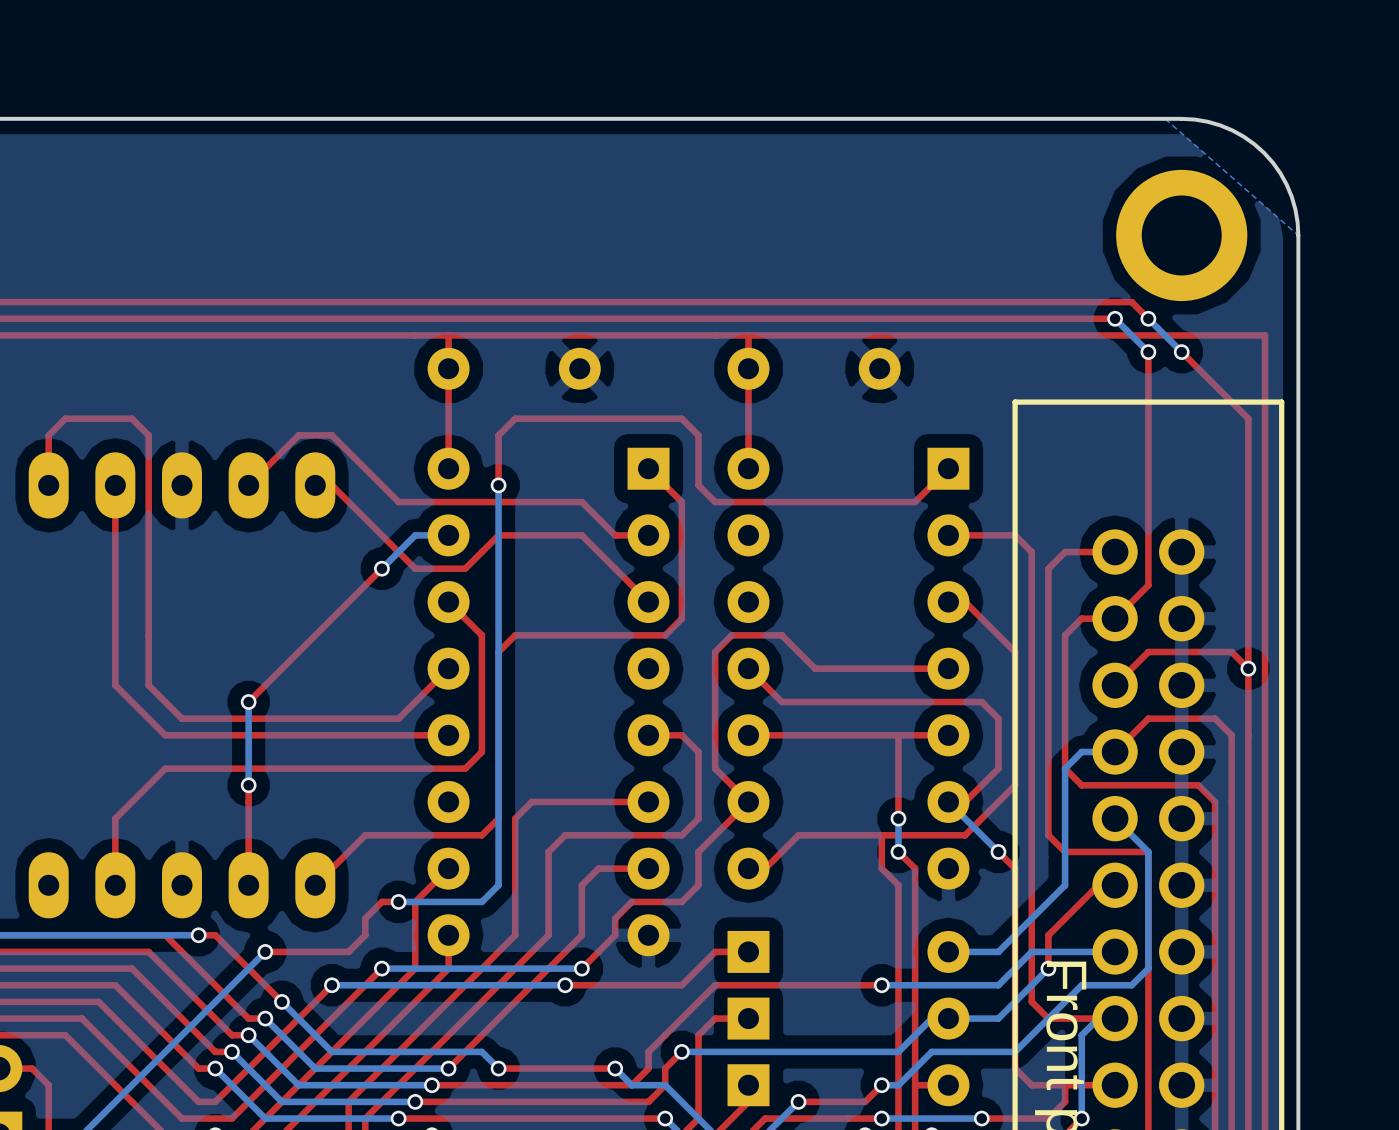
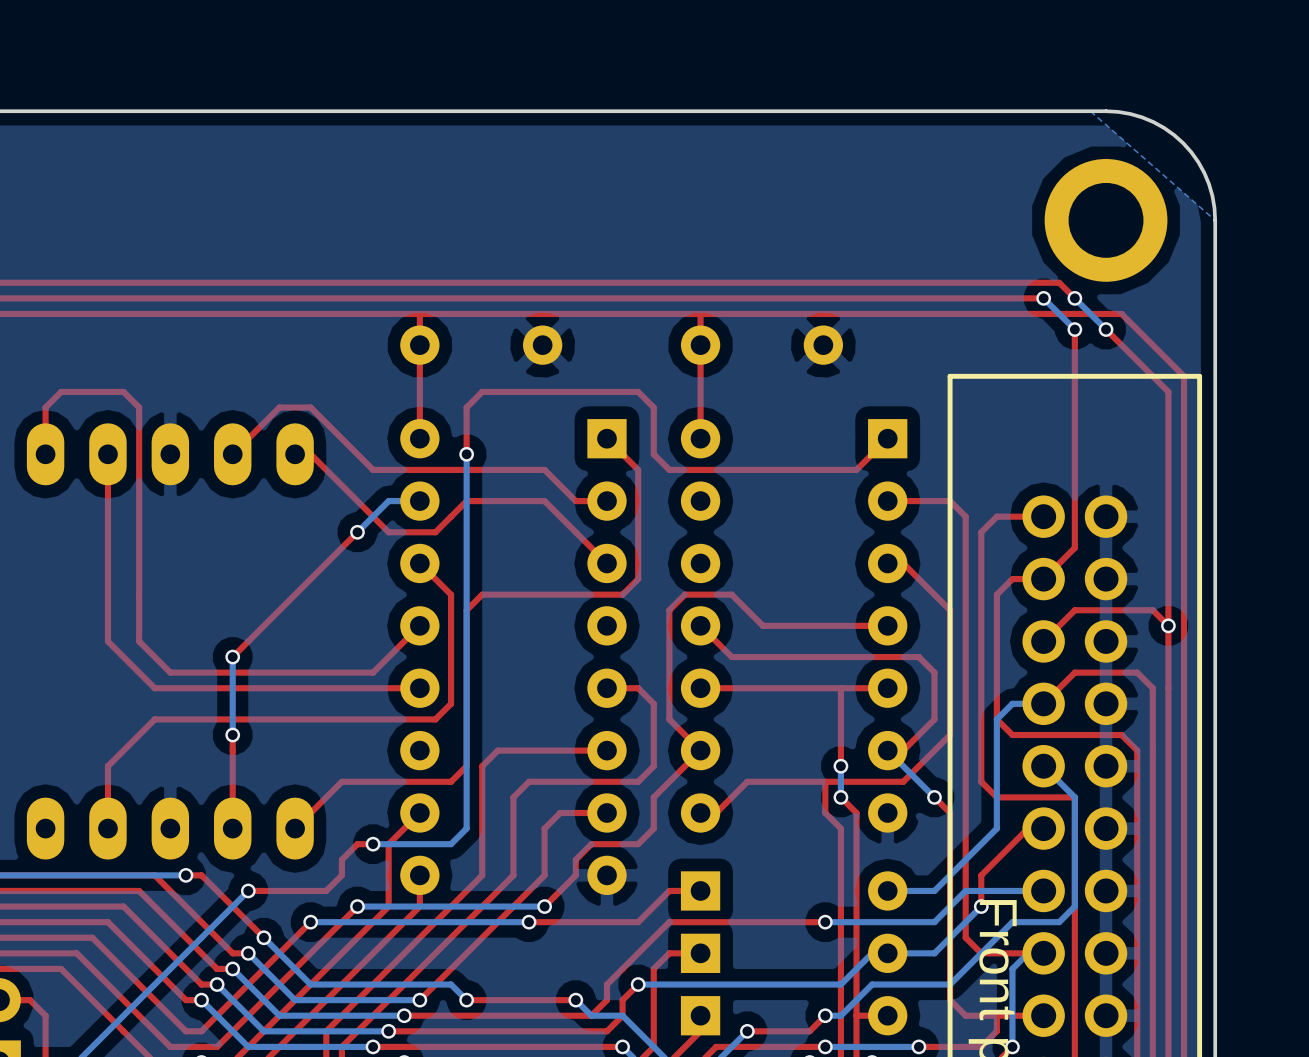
top track: (1198, 335) (1265, 335) (1265, 402) -> (1121, 313) (1184, 376)

